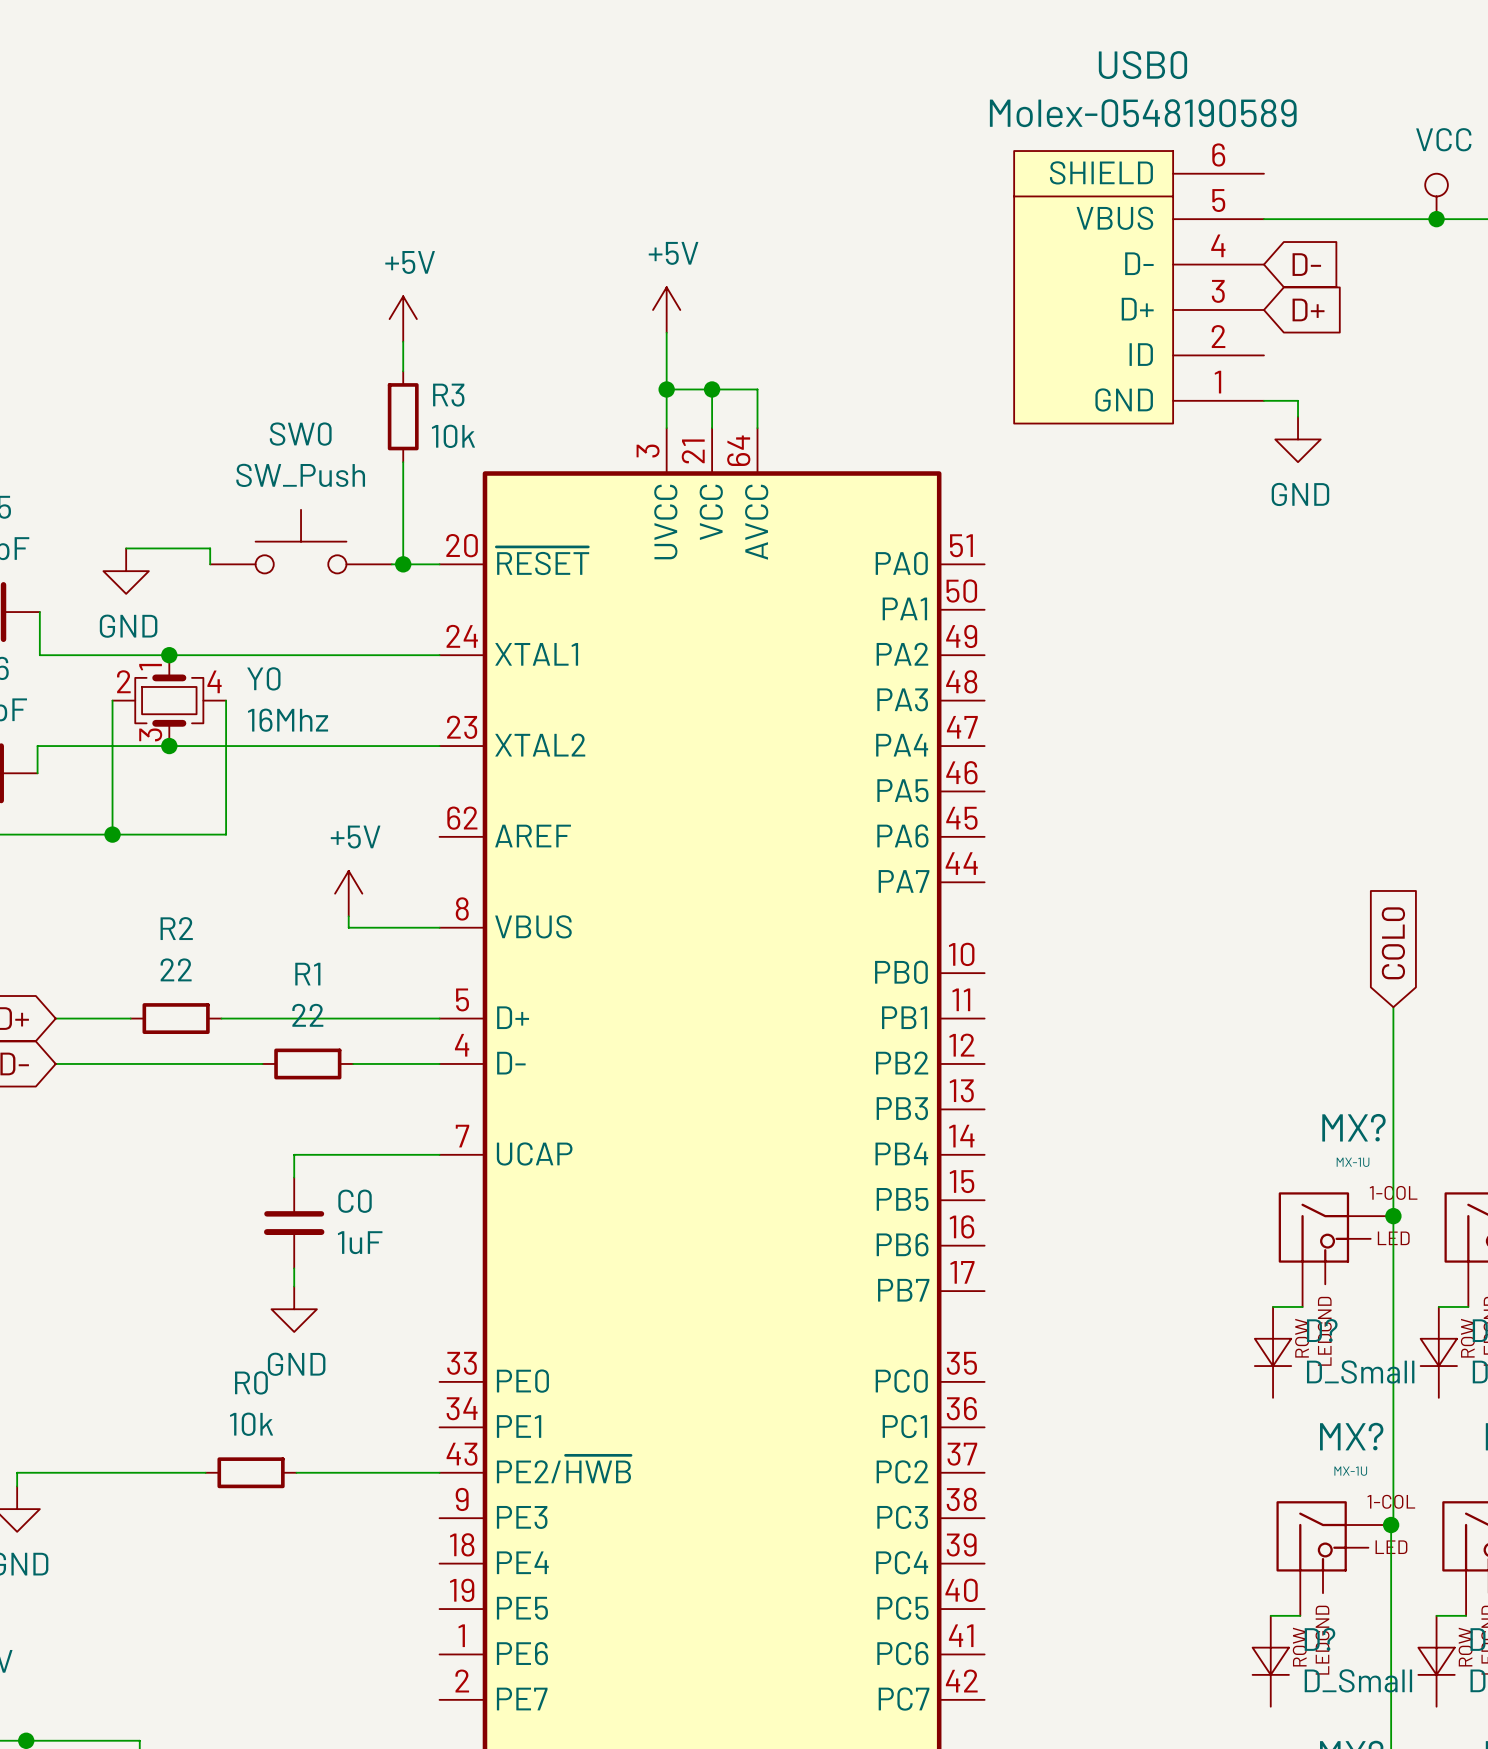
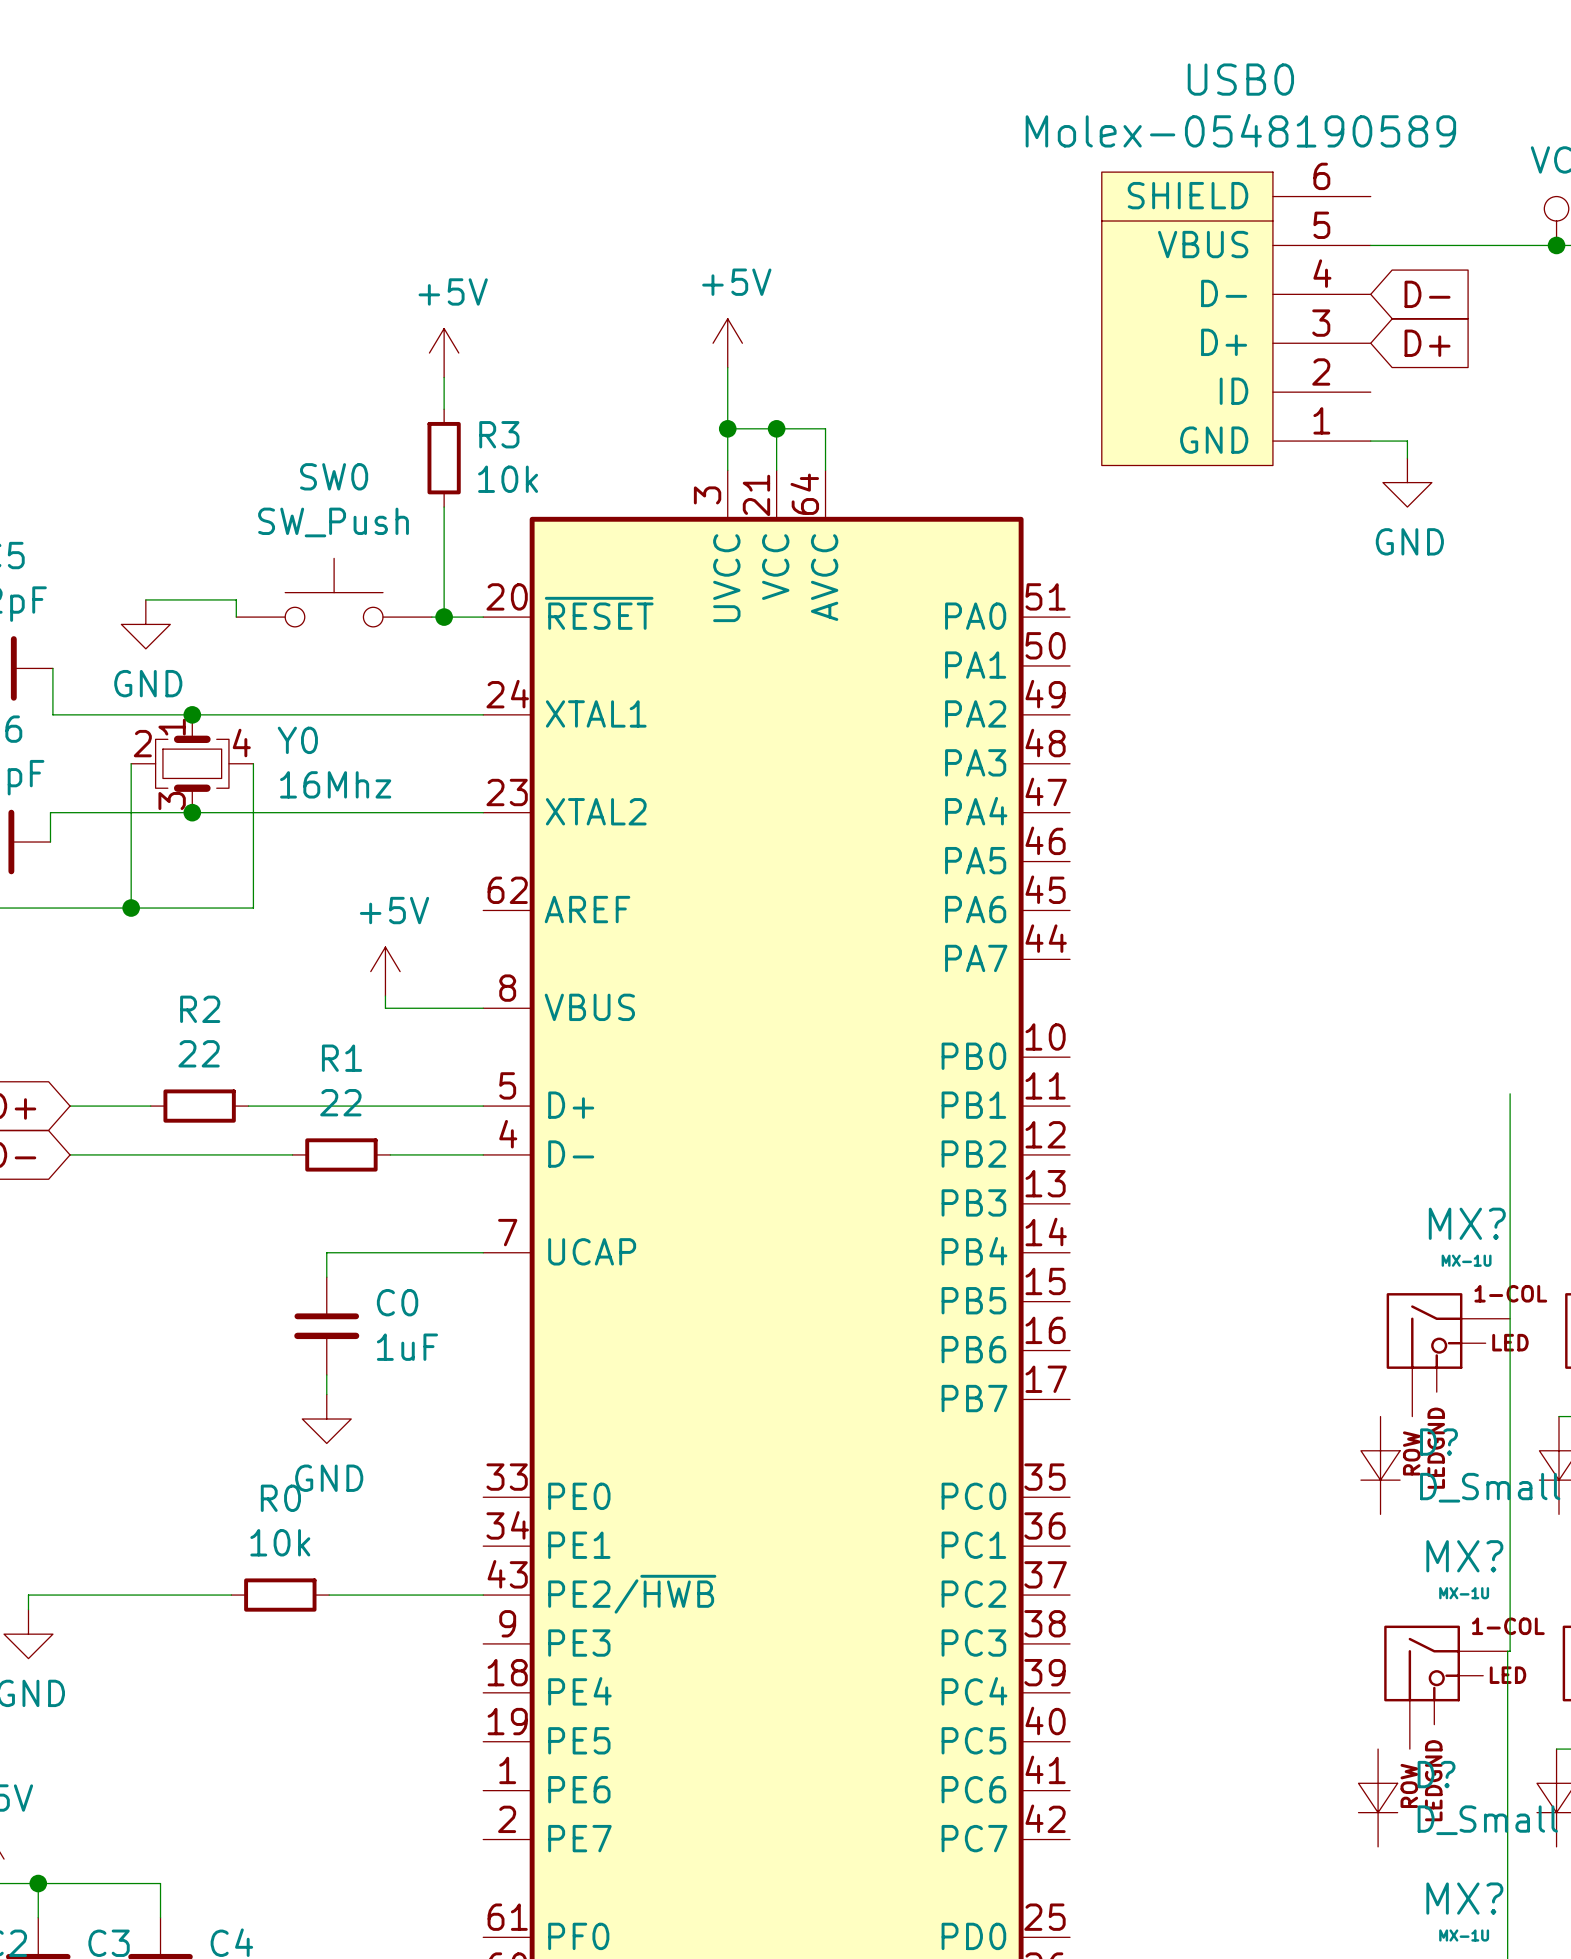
global label: COL0 (1393, 943) -> none
junction: (1393, 1216) -> none
wire: (1273, 1306) (1302, 1306) -> none
junction: (1391, 1525) -> none
wire: (1270, 1615) (1300, 1615) -> none

